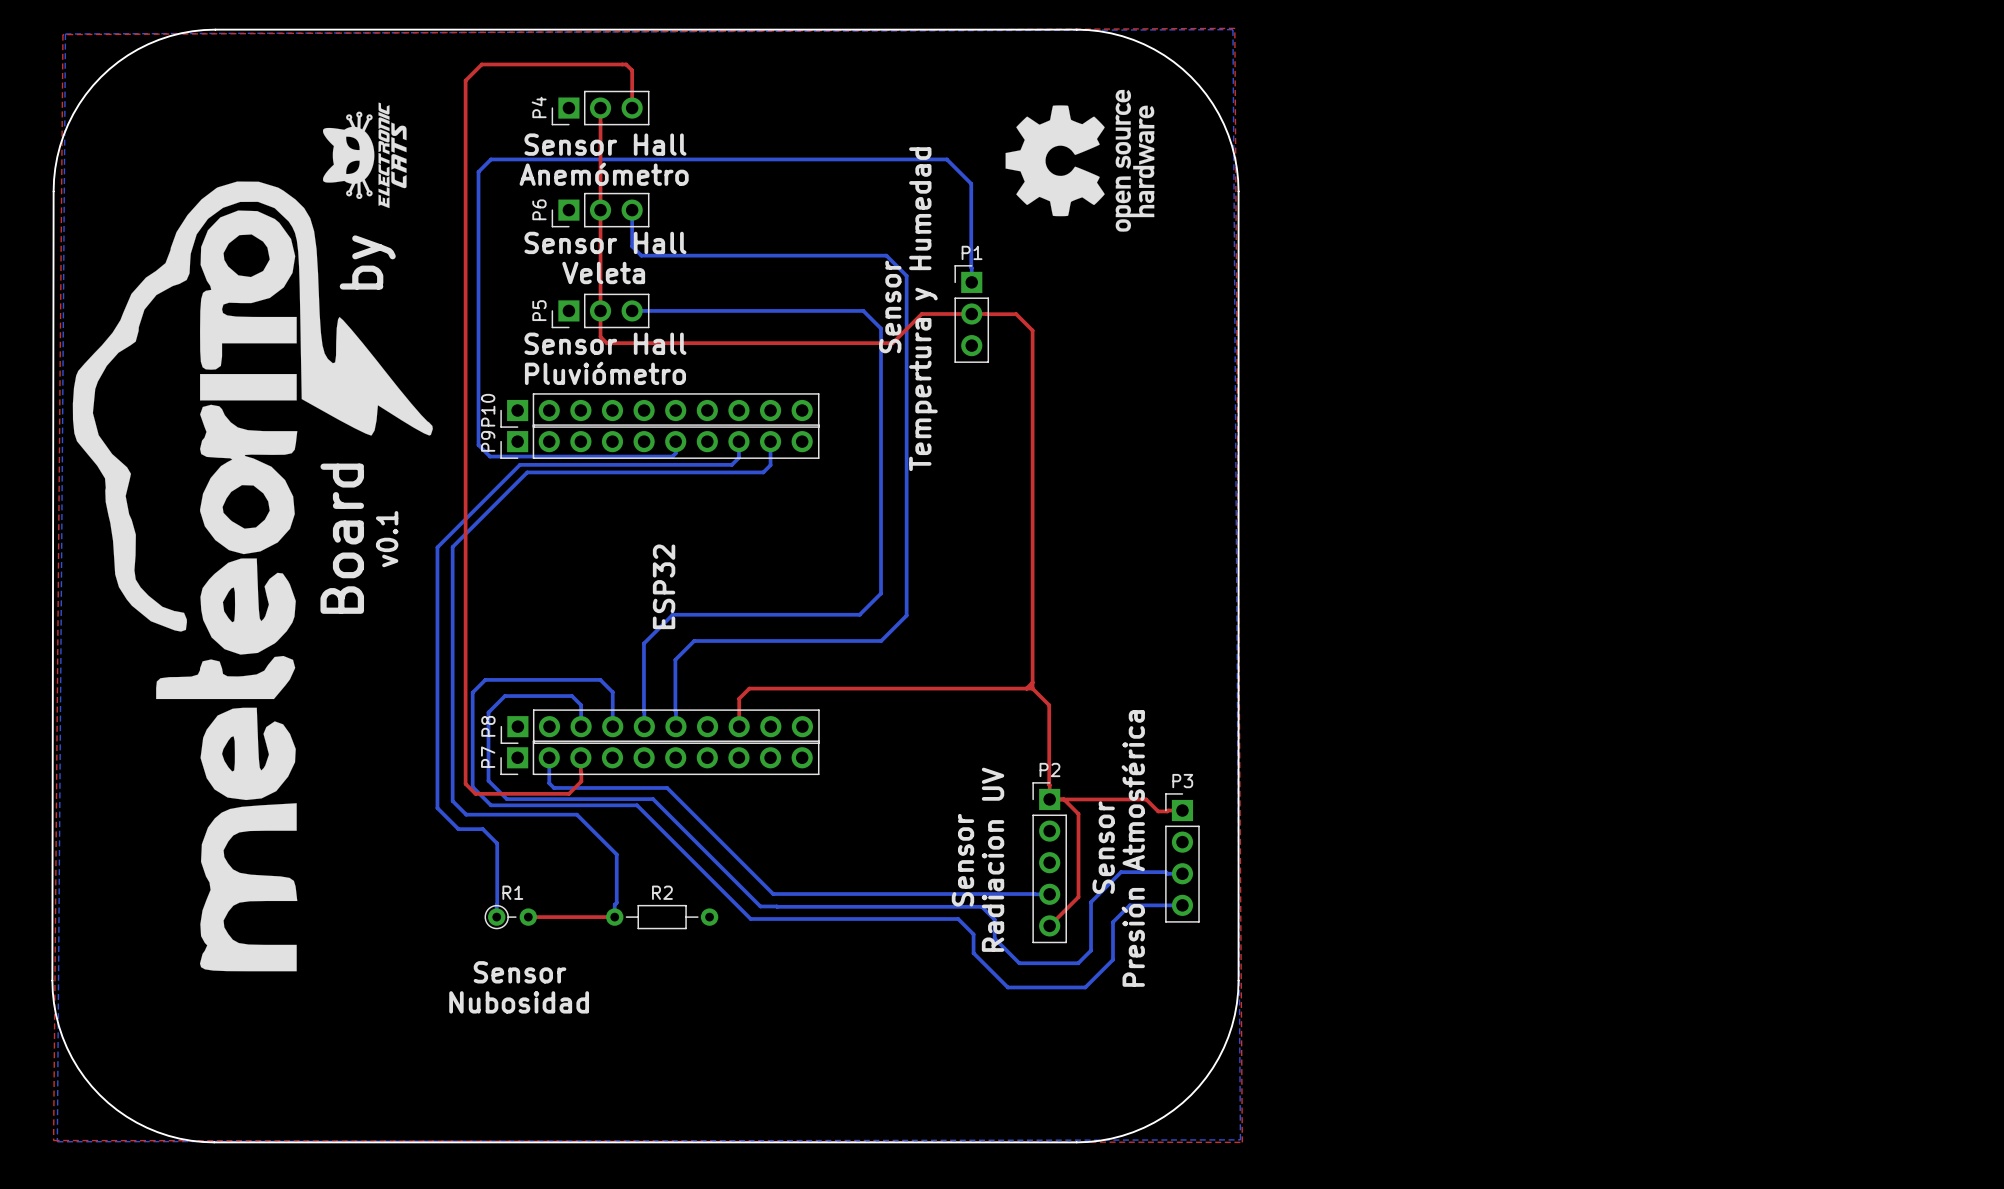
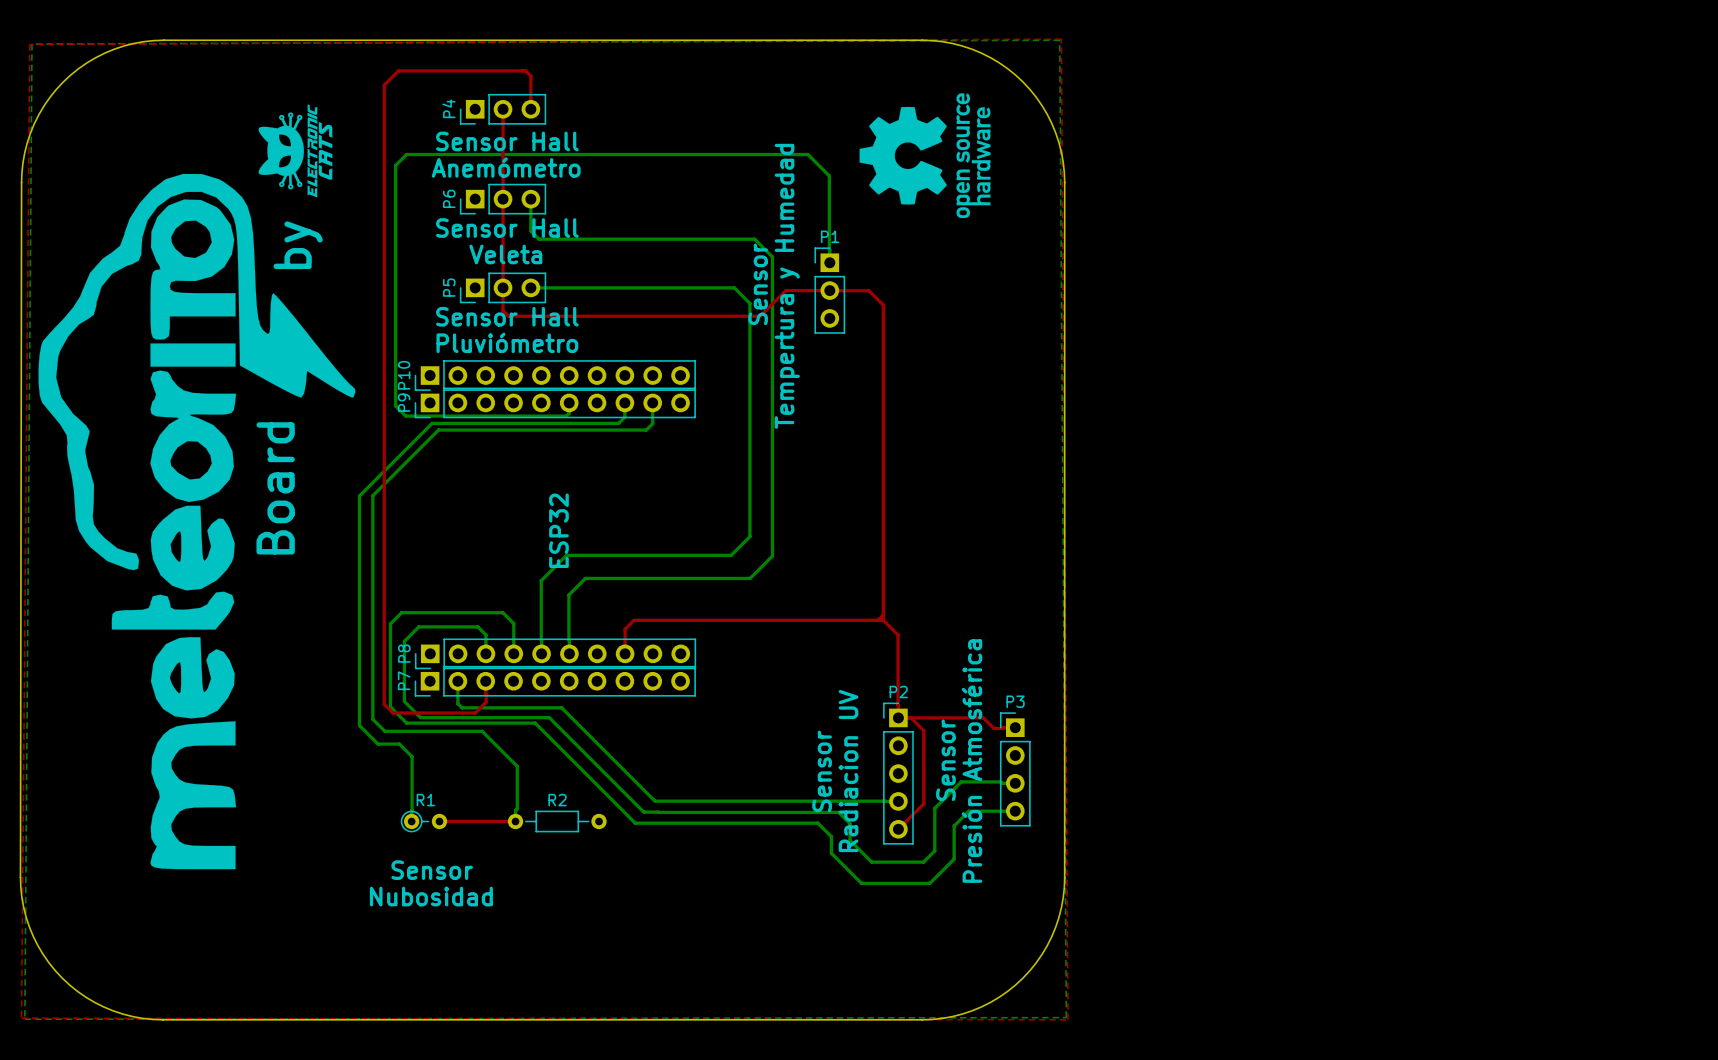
text: v0.1 (387, 539) -> none

